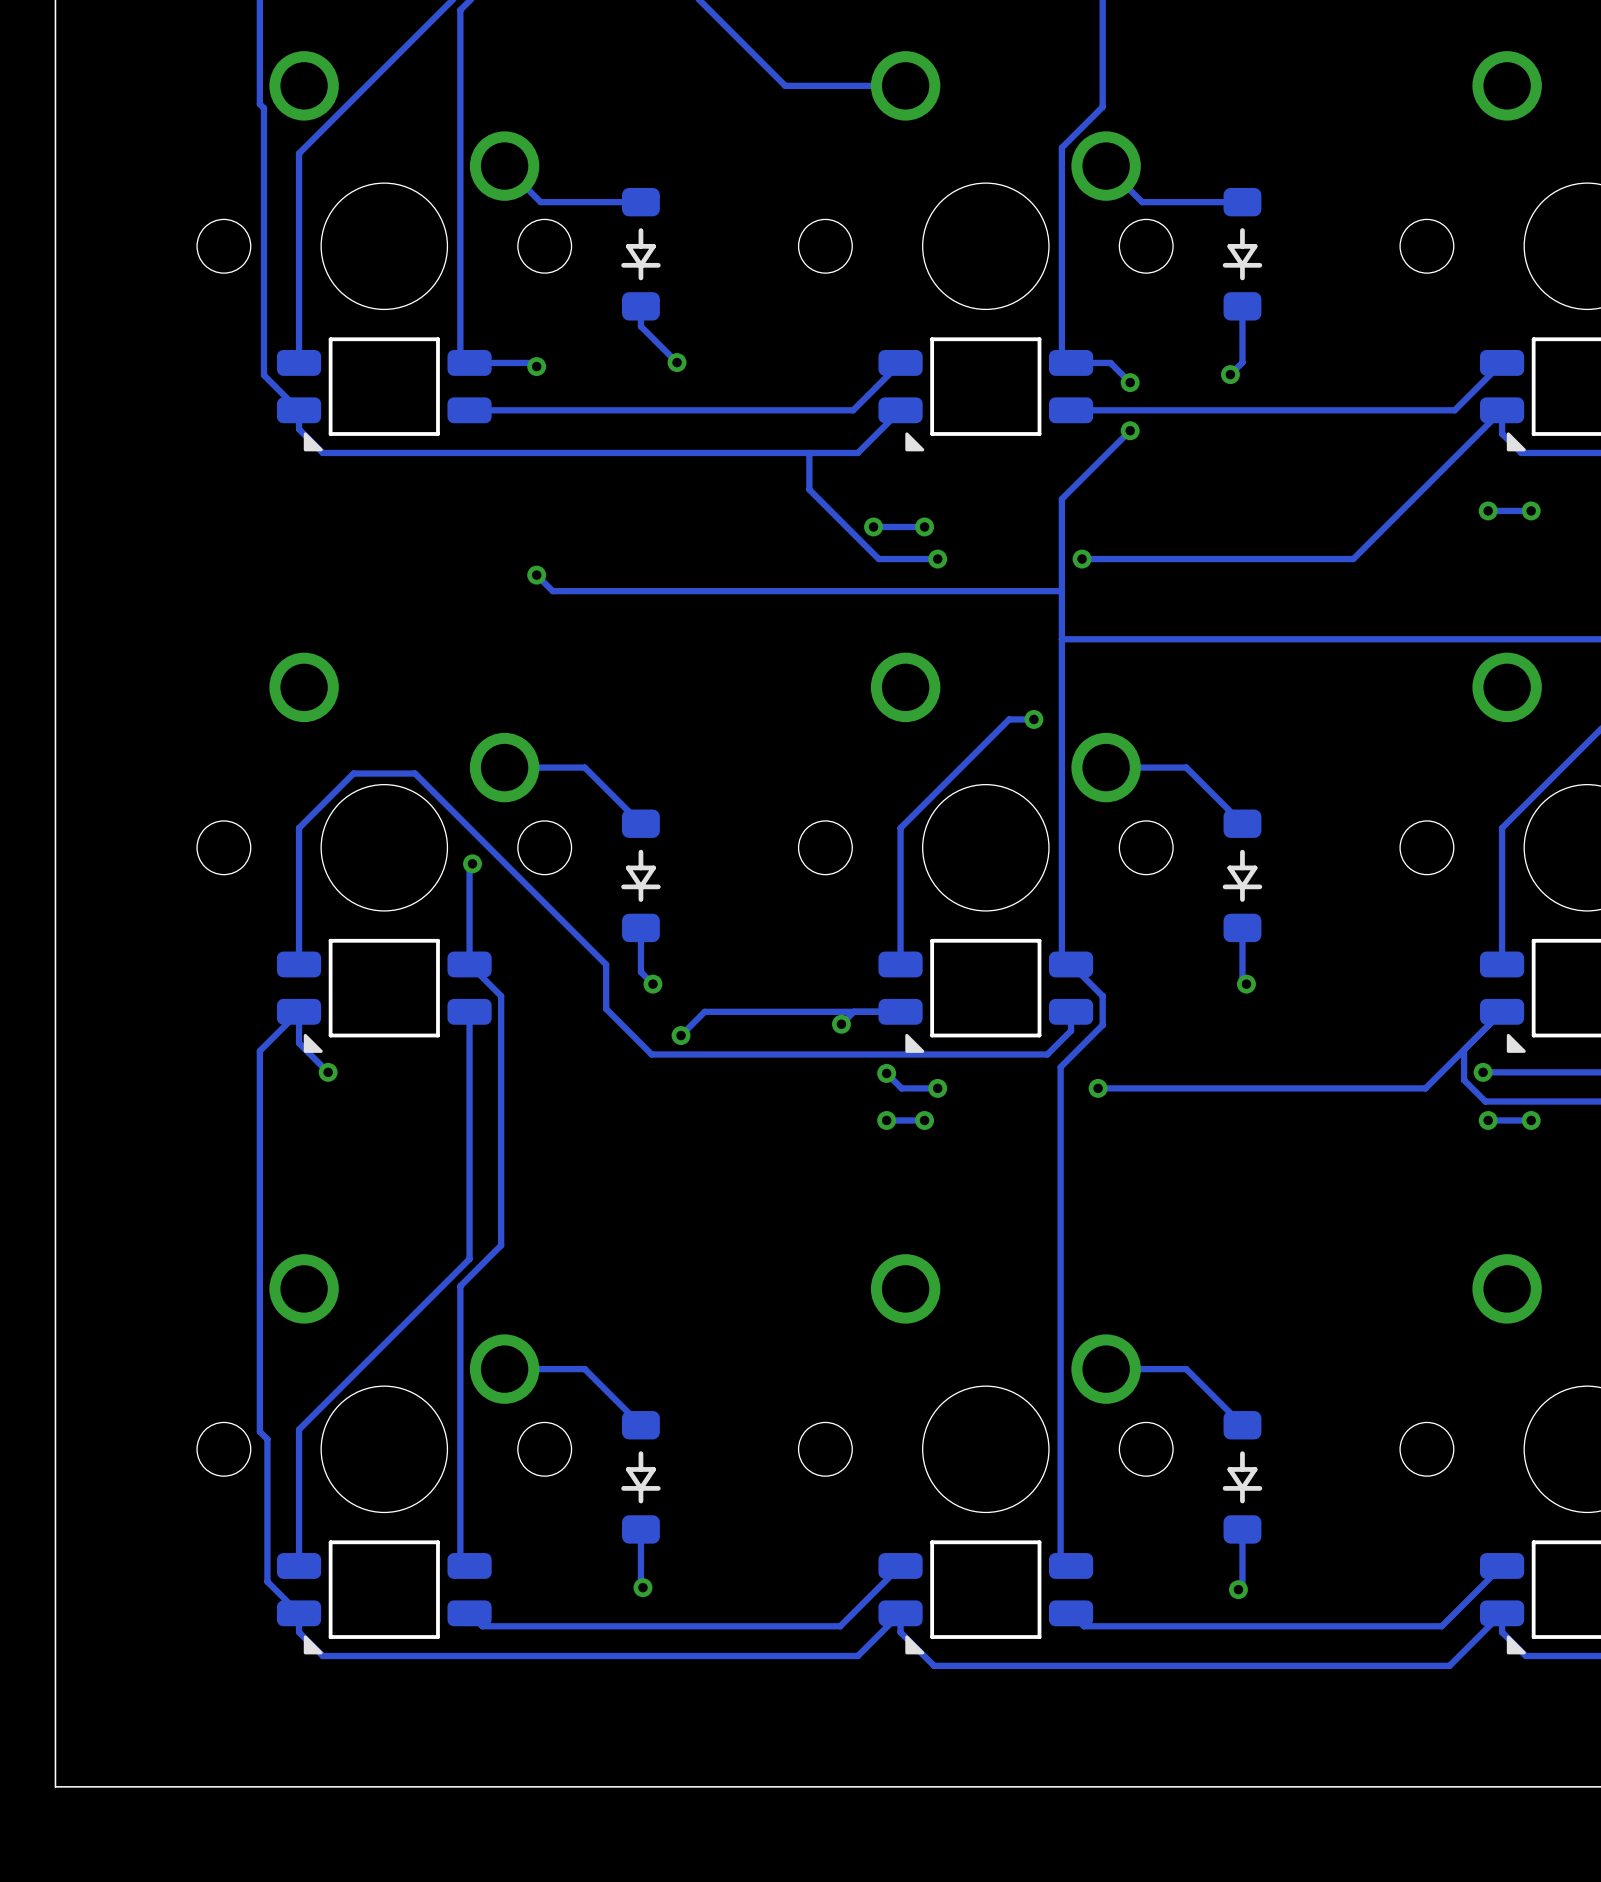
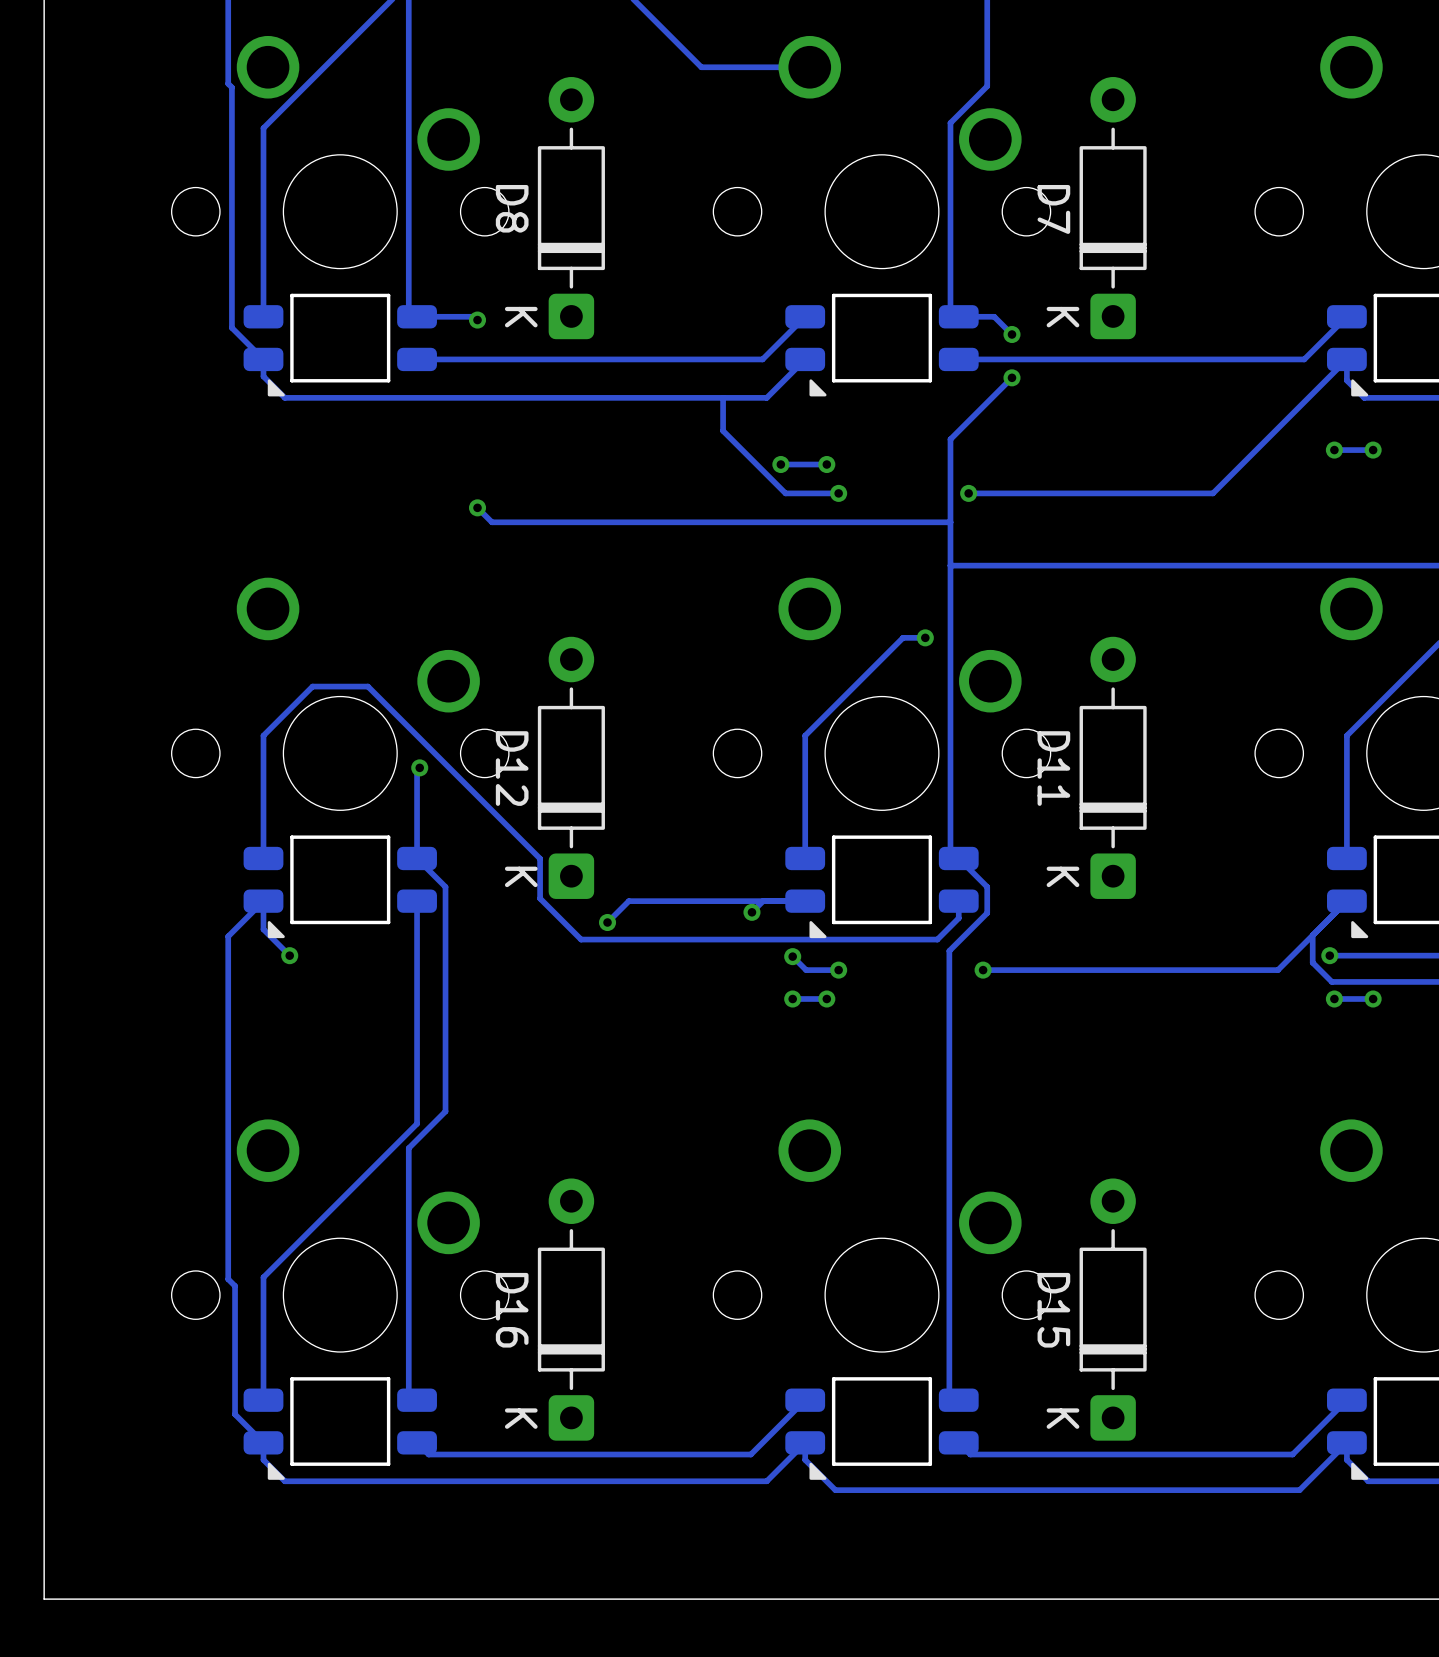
track: (504, 166) (540, 202) (640, 202) -> none
track: (1106, 166) (1142, 202) (1242, 202) -> none
D8: none -> (571, 208)
D7: none -> (1113, 208)
part: (640, 254) -> none
part: (1242, 254) -> none
track: (640, 306) (640, 326) (677, 362) -> none
track: (1242, 306) (1242, 362) (1230, 374) -> none
via: (677, 362) -> none
via: (1230, 374) -> none
track: (504, 767) (584, 767) (640, 823) -> none
track: (1106, 767) (1186, 767) (1242, 823) -> none
D12: none -> (571, 767)
D11: none -> (1113, 767)
part: (640, 875) -> none
part: (1242, 875) -> none
track: (640, 927) (640, 972) (652, 984) -> none
track: (1242, 927) (1242, 980) (1246, 984) -> none
via: (652, 984) -> none
via: (1246, 984) -> none
track: (504, 1369) (584, 1369) (640, 1425) -> none
track: (1106, 1369) (1186, 1369) (1242, 1425) -> none
D16: none -> (571, 1309)
D15: none -> (1113, 1309)
part: (640, 1477) -> none
part: (1242, 1477) -> none
track: (640, 1529) (640, 1585) (642, 1587) -> none
track: (1242, 1529) (1242, 1585) (1238, 1589) -> none
via: (642, 1587) -> none
via: (1238, 1589) -> none

